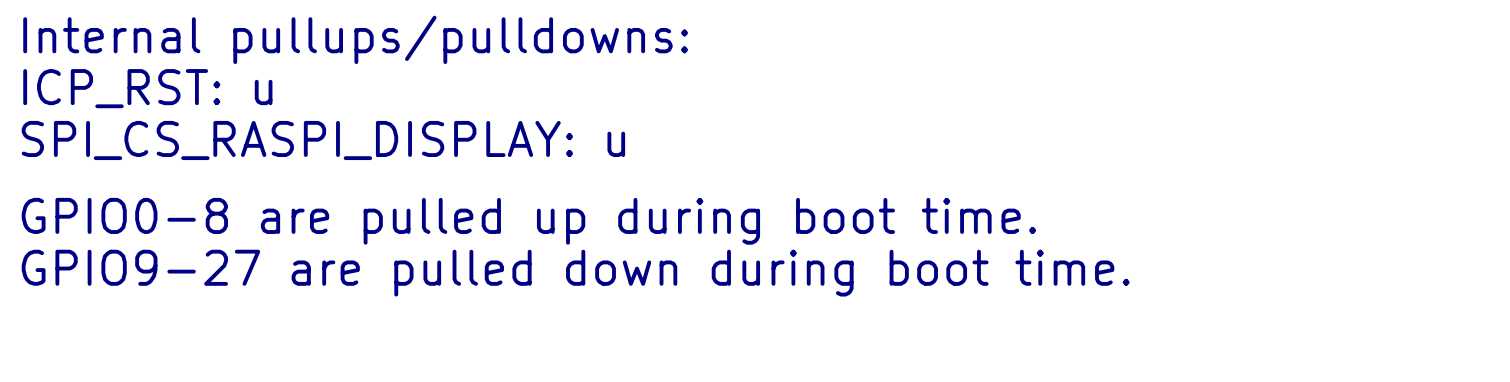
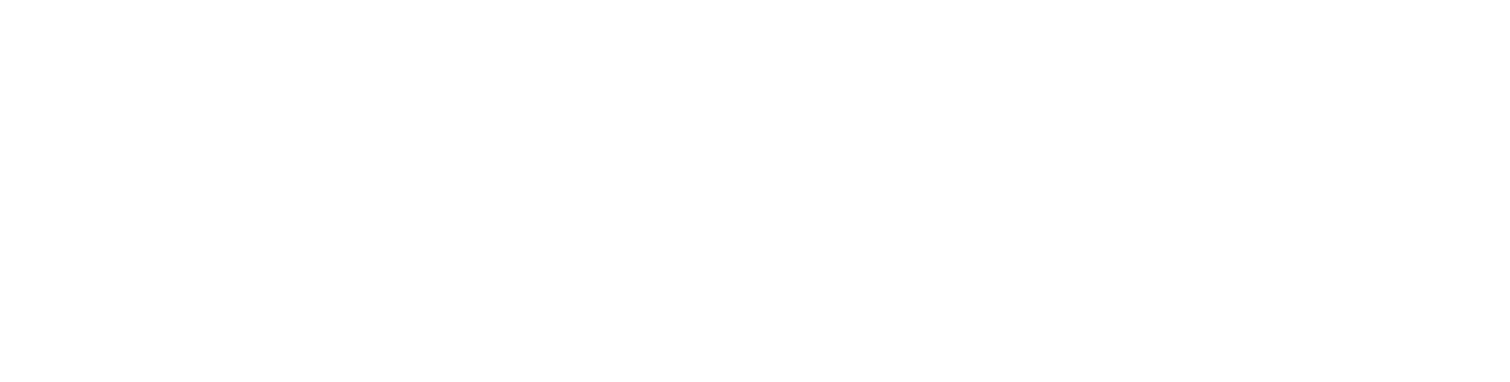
text: Internal pullups/pulldowns: (355, 39) -> none
text: ICP_RST: u (147, 88) -> none
text: SPI_CS_RASPI_DISPLAY: u (323, 140) -> none
text: GPIO0-8 are pulled up during boot time. (528, 221) -> none
text: GPIO9-27 are pulled down during boot time. (575, 273) -> none

